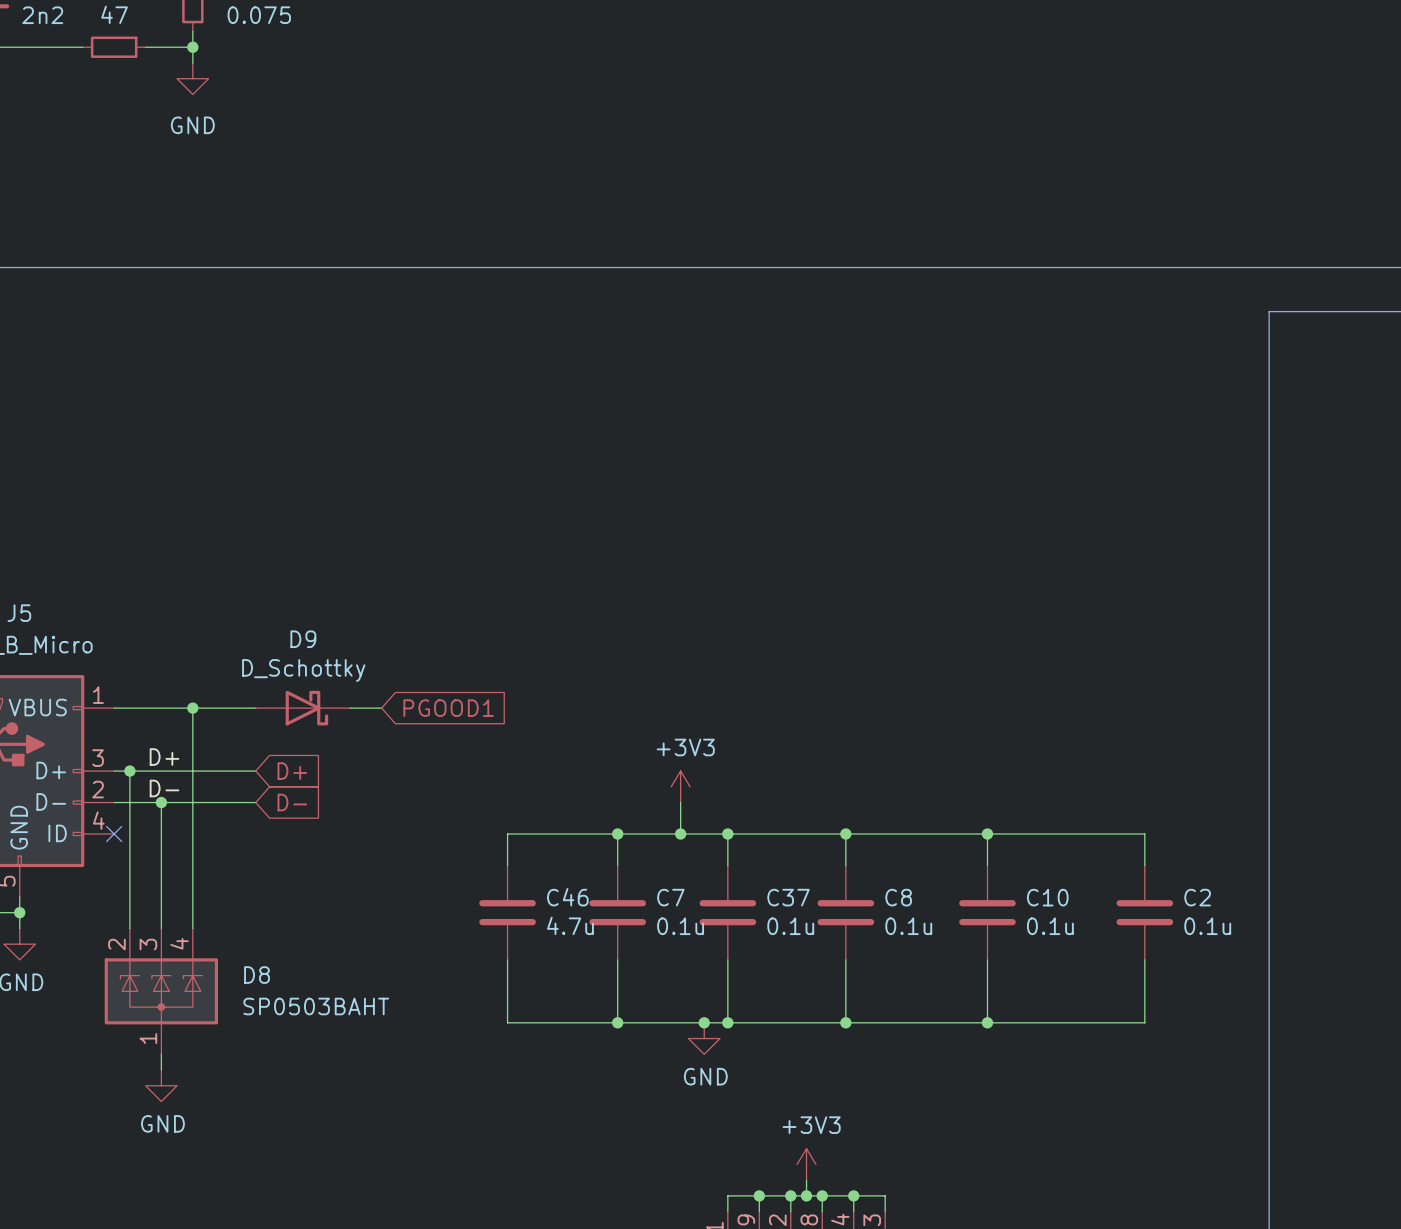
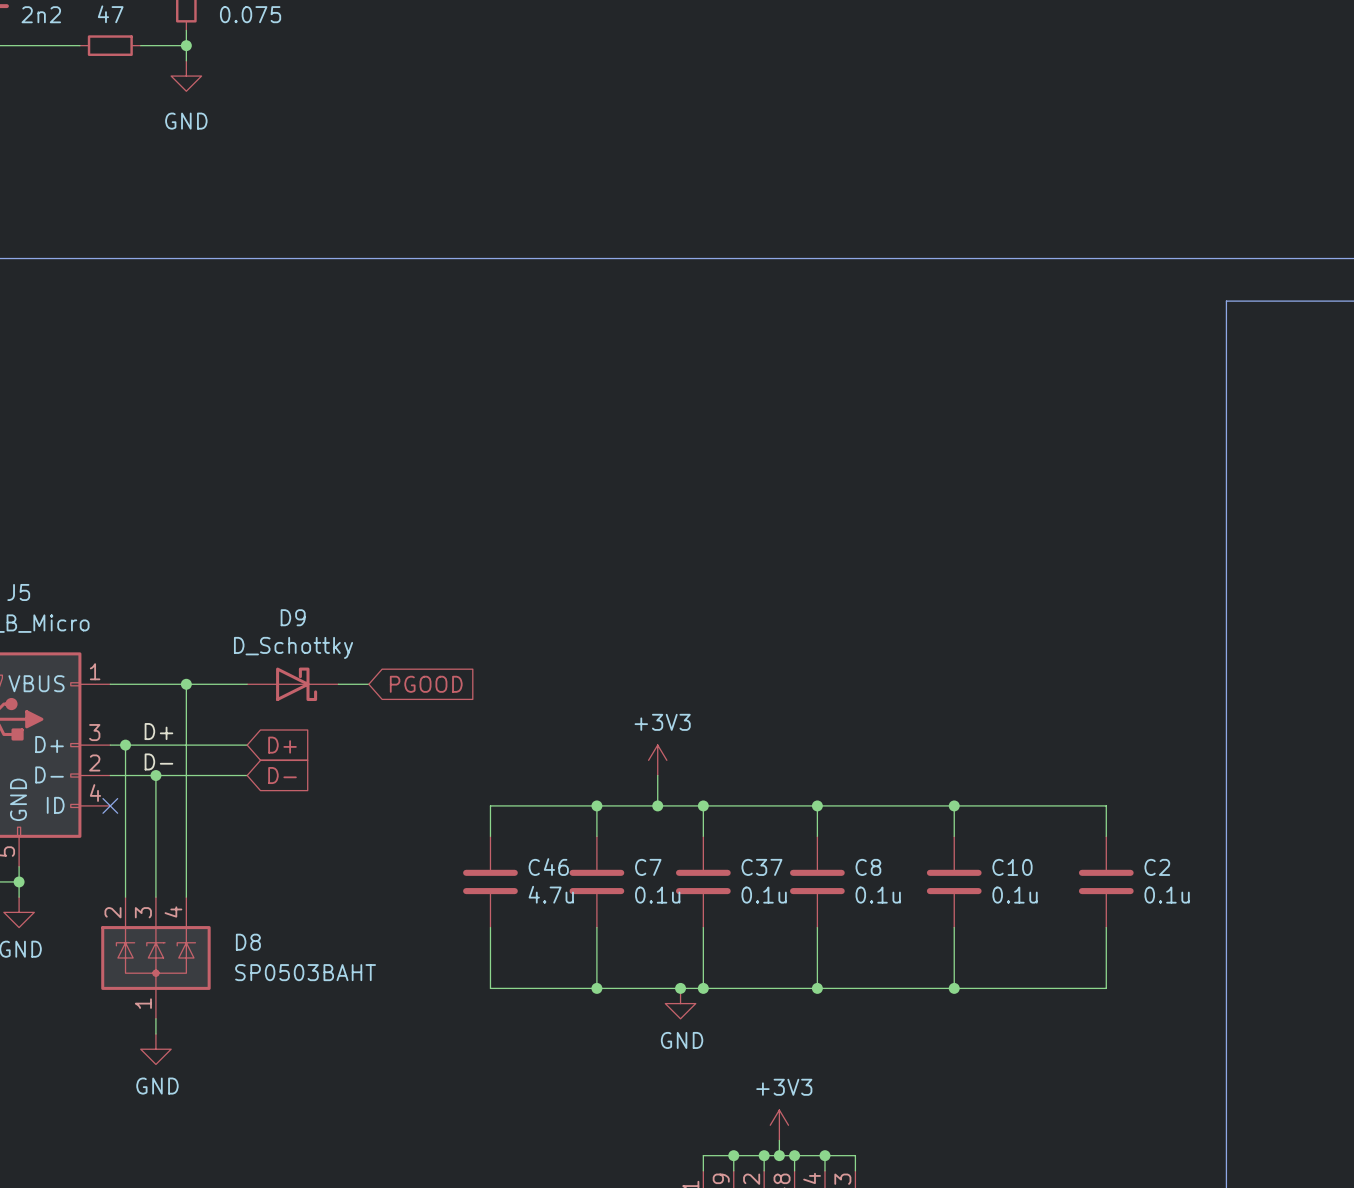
global label: PGOOD1 (448, 708) -> PGOOD (426, 684)

